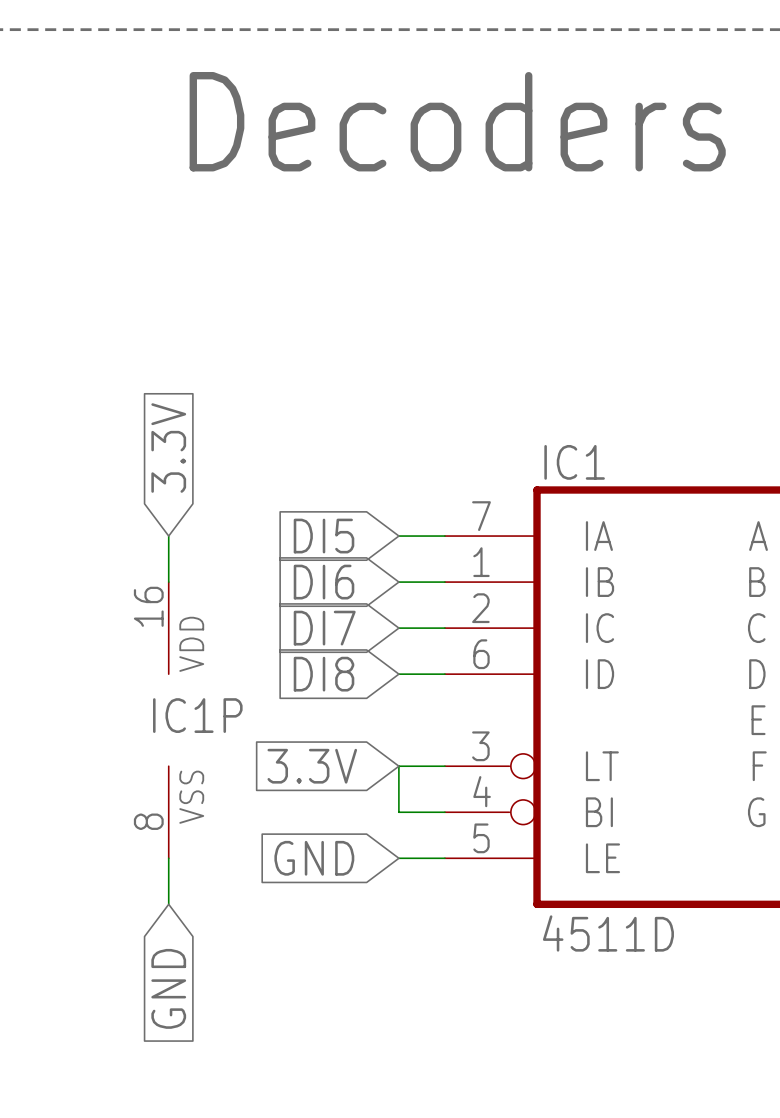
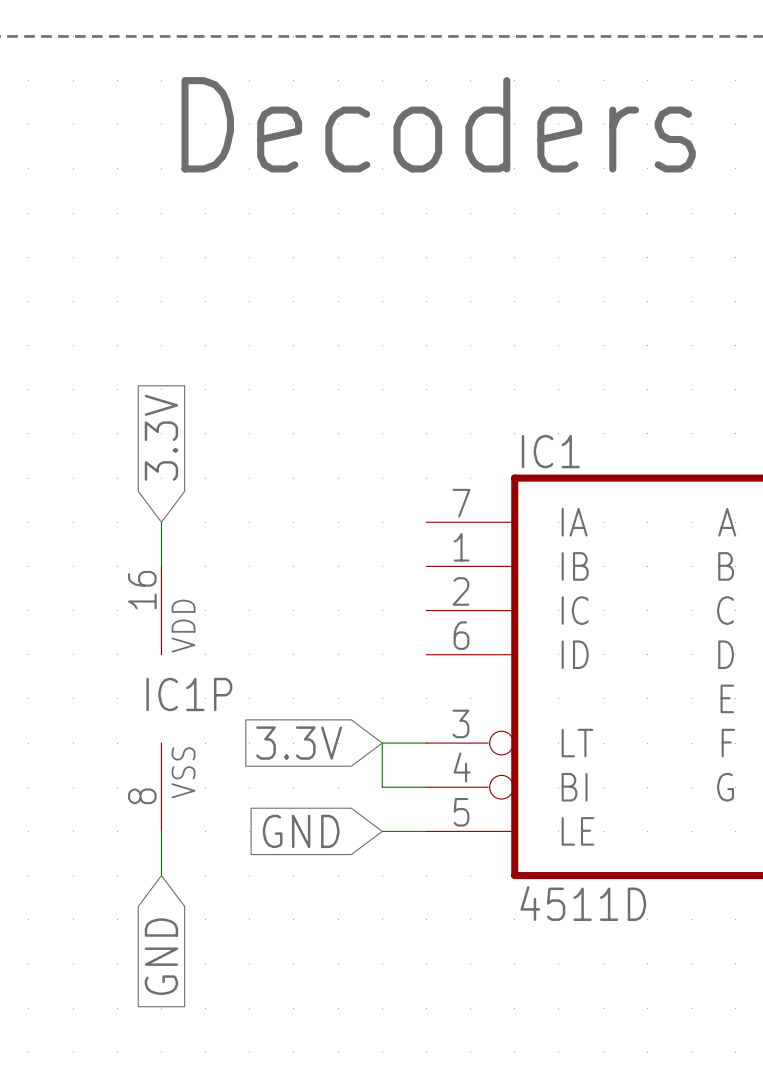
global label: DI5 (324, 536) -> none
wire: (398, 536) (444, 536) -> none
global label: DI6 (324, 582) -> none
wire: (398, 582) (444, 582) -> none
global label: DI7 (324, 628) -> none
wire: (398, 628) (444, 628) -> none
global label: DI8 (324, 674) -> none
wire: (398, 674) (444, 674) -> none

